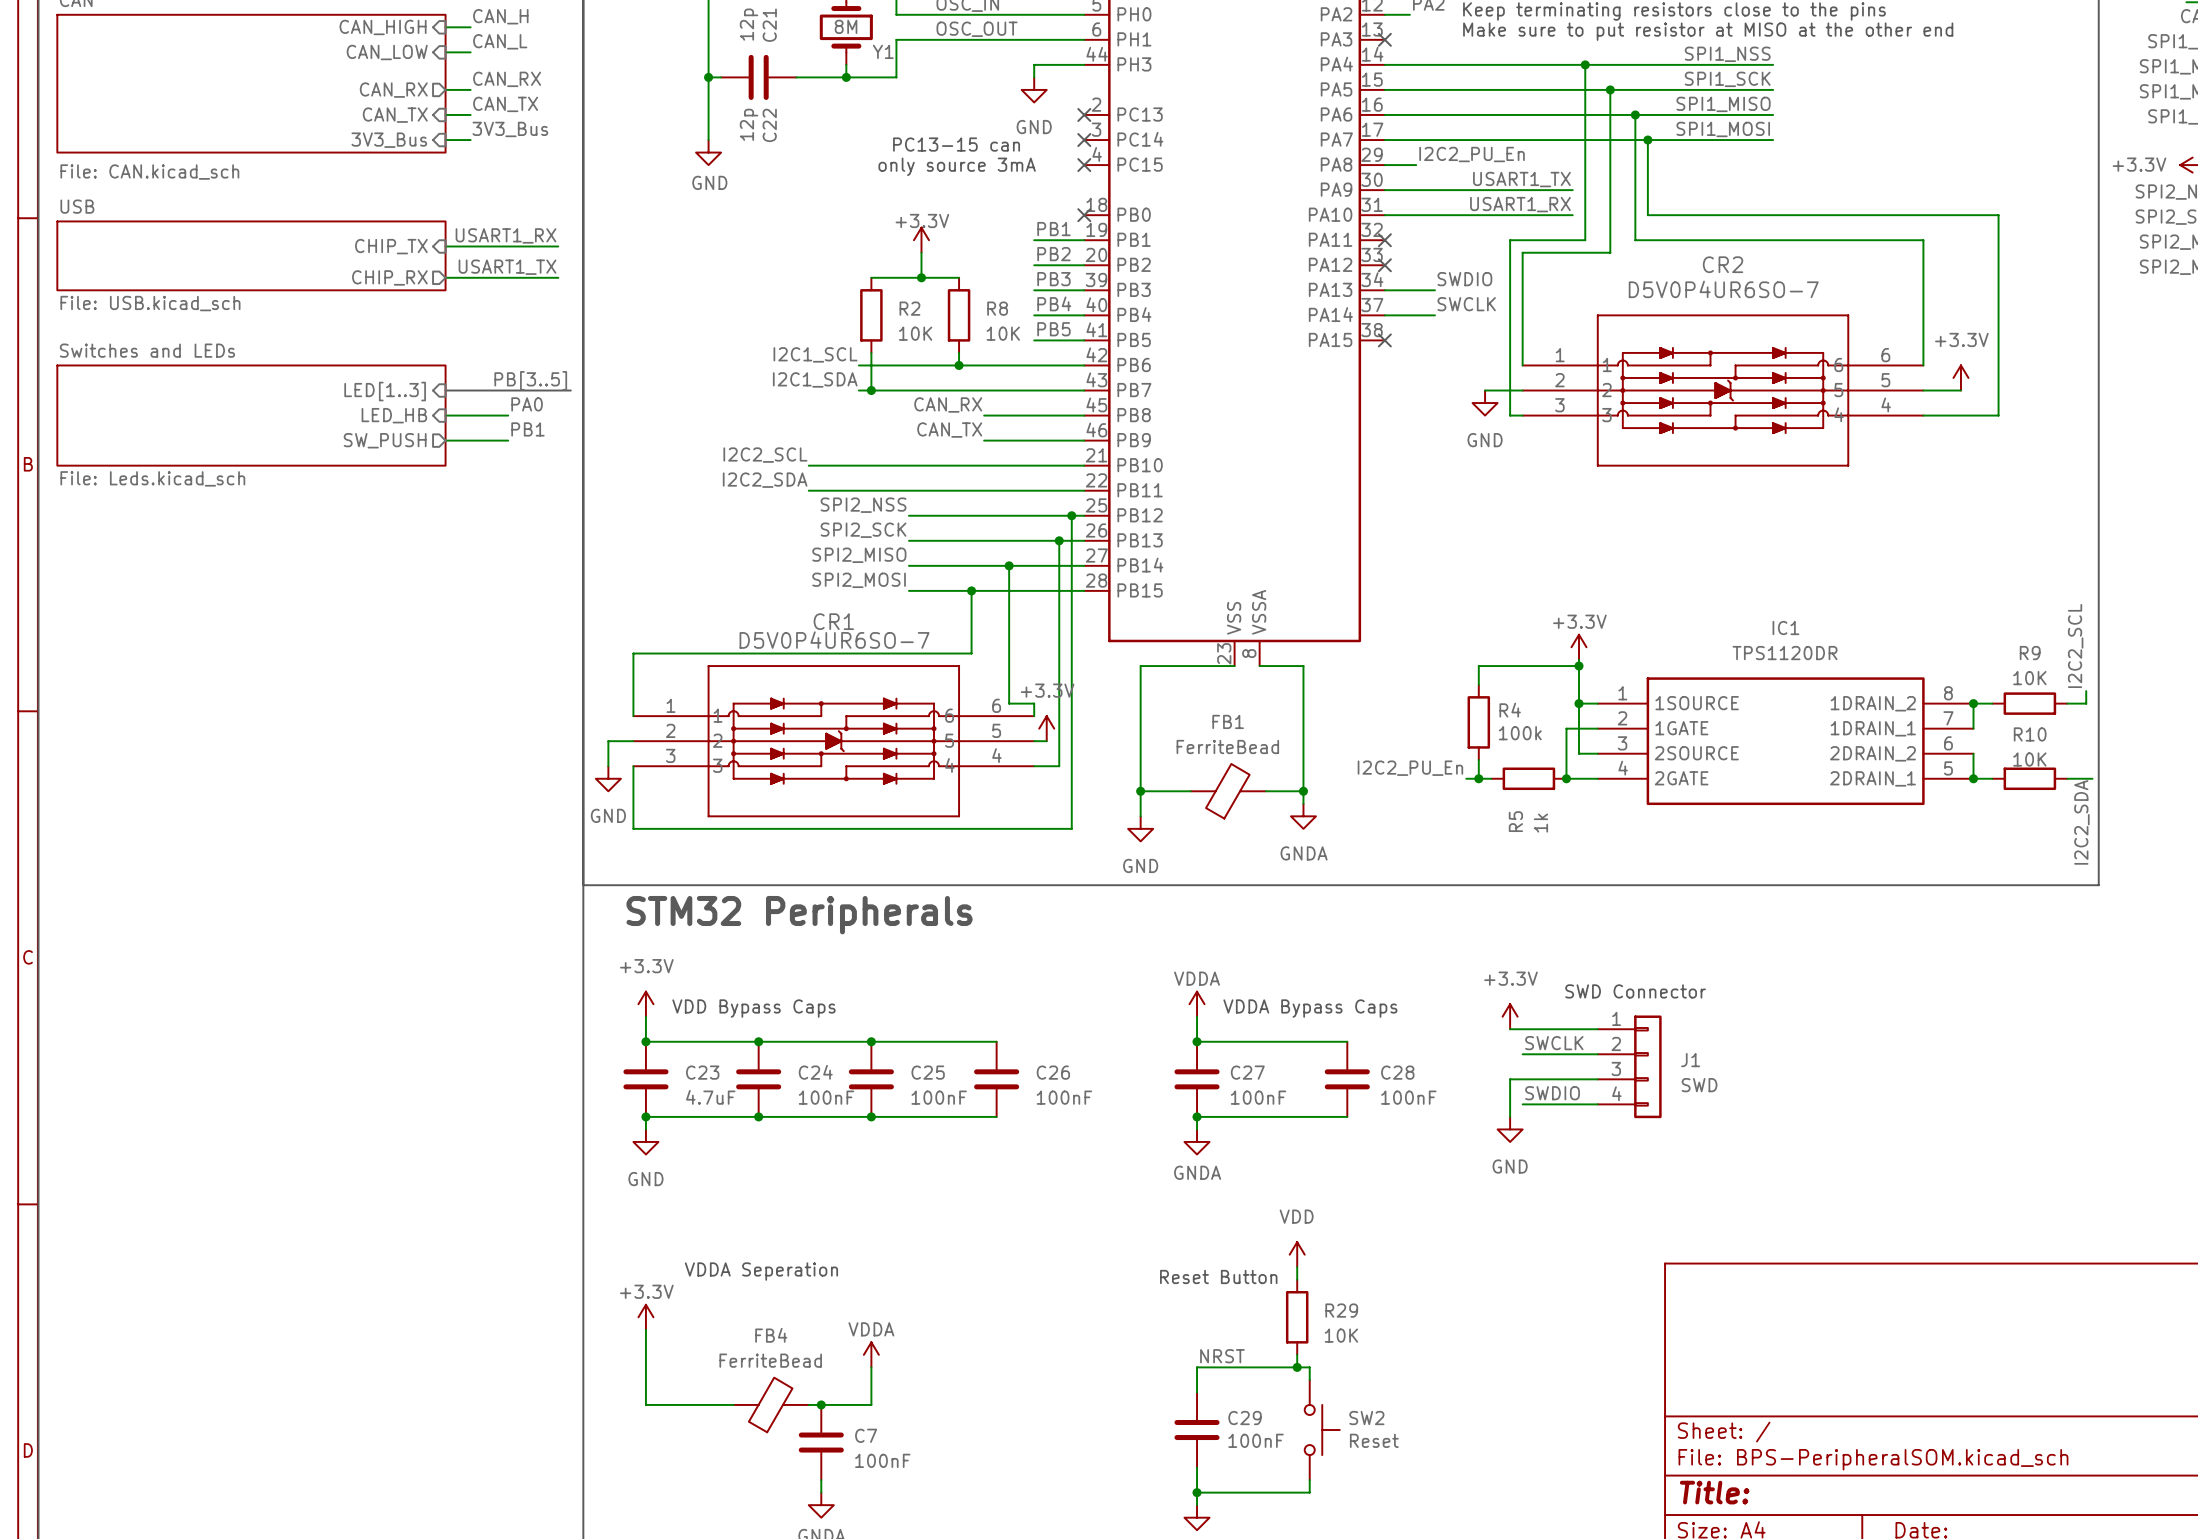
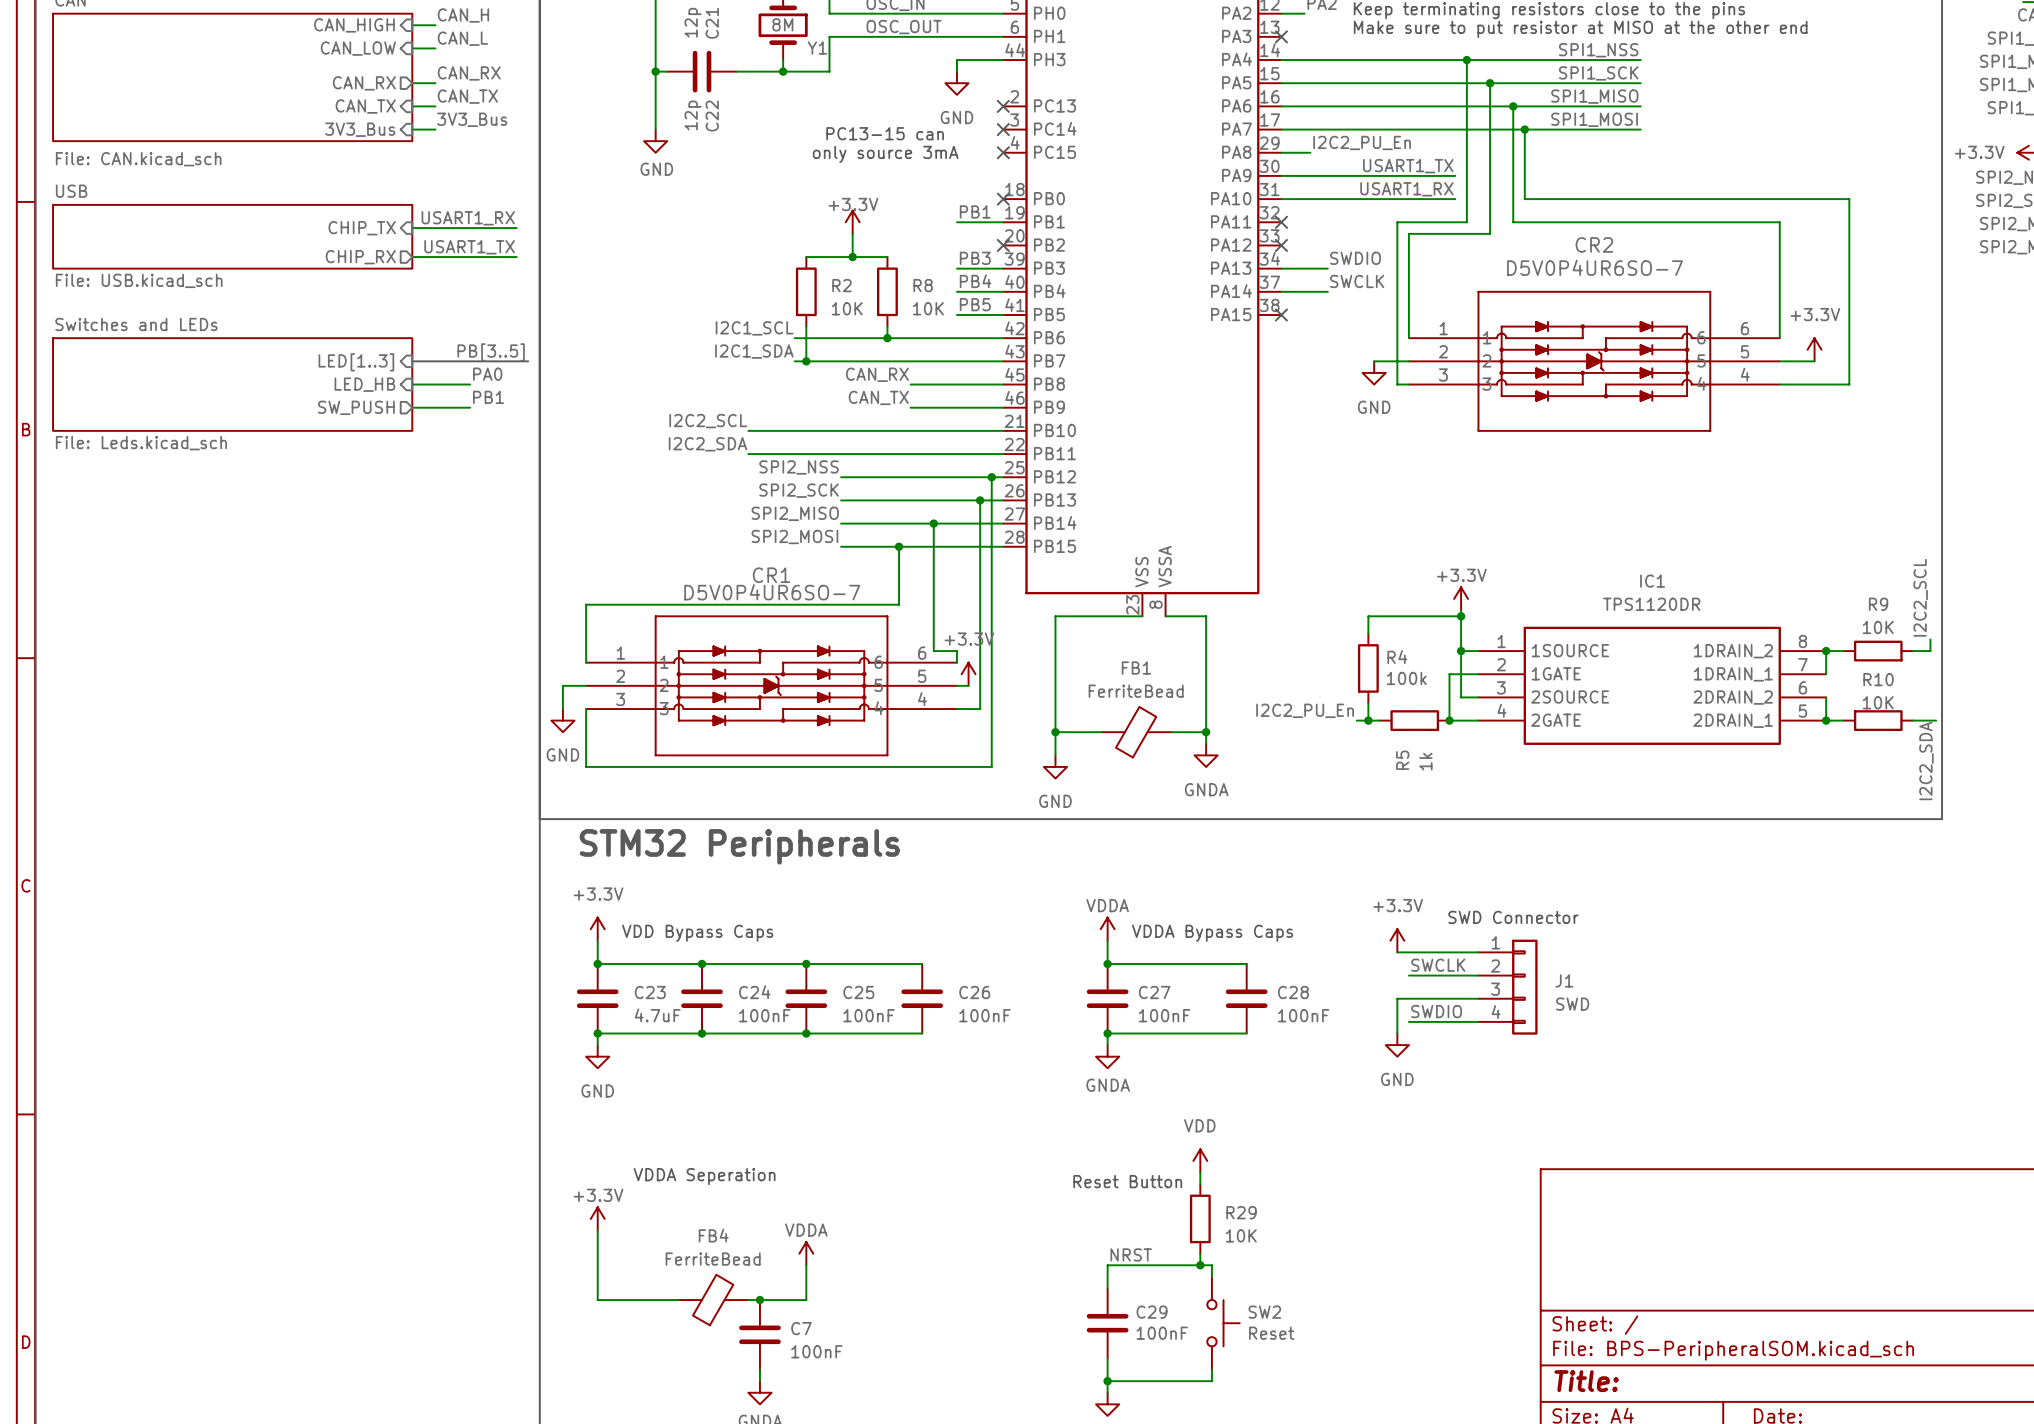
label: PB2 (1053, 254) -> none
wire: (1034, 265) (1084, 265) -> none
no-connect mark: none -> (1003, 245)

